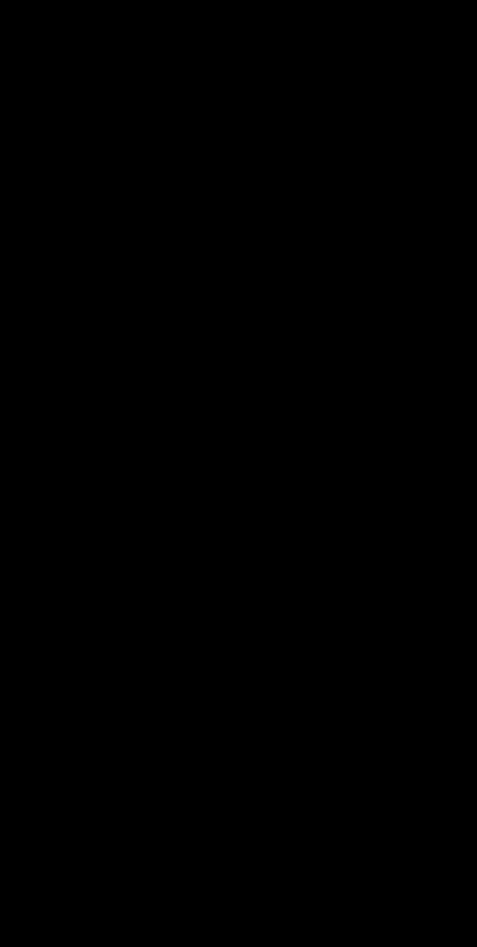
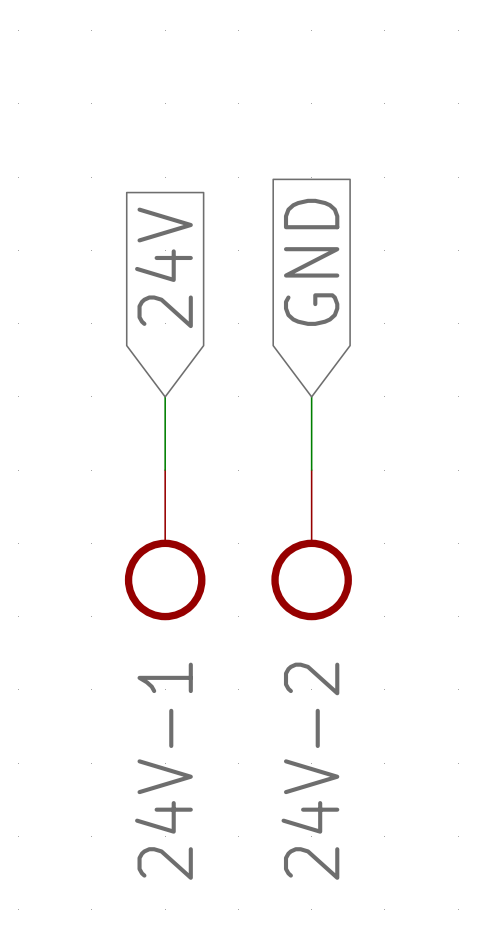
global label: none -> GND (311, 262)
global label: none -> 24V (163, 267)
wire: none -> (165, 396) (165, 470)
wire: none -> (311, 396) (311, 470)
24V-1: none -> (165, 545)
24V-2: none -> (311, 545)

